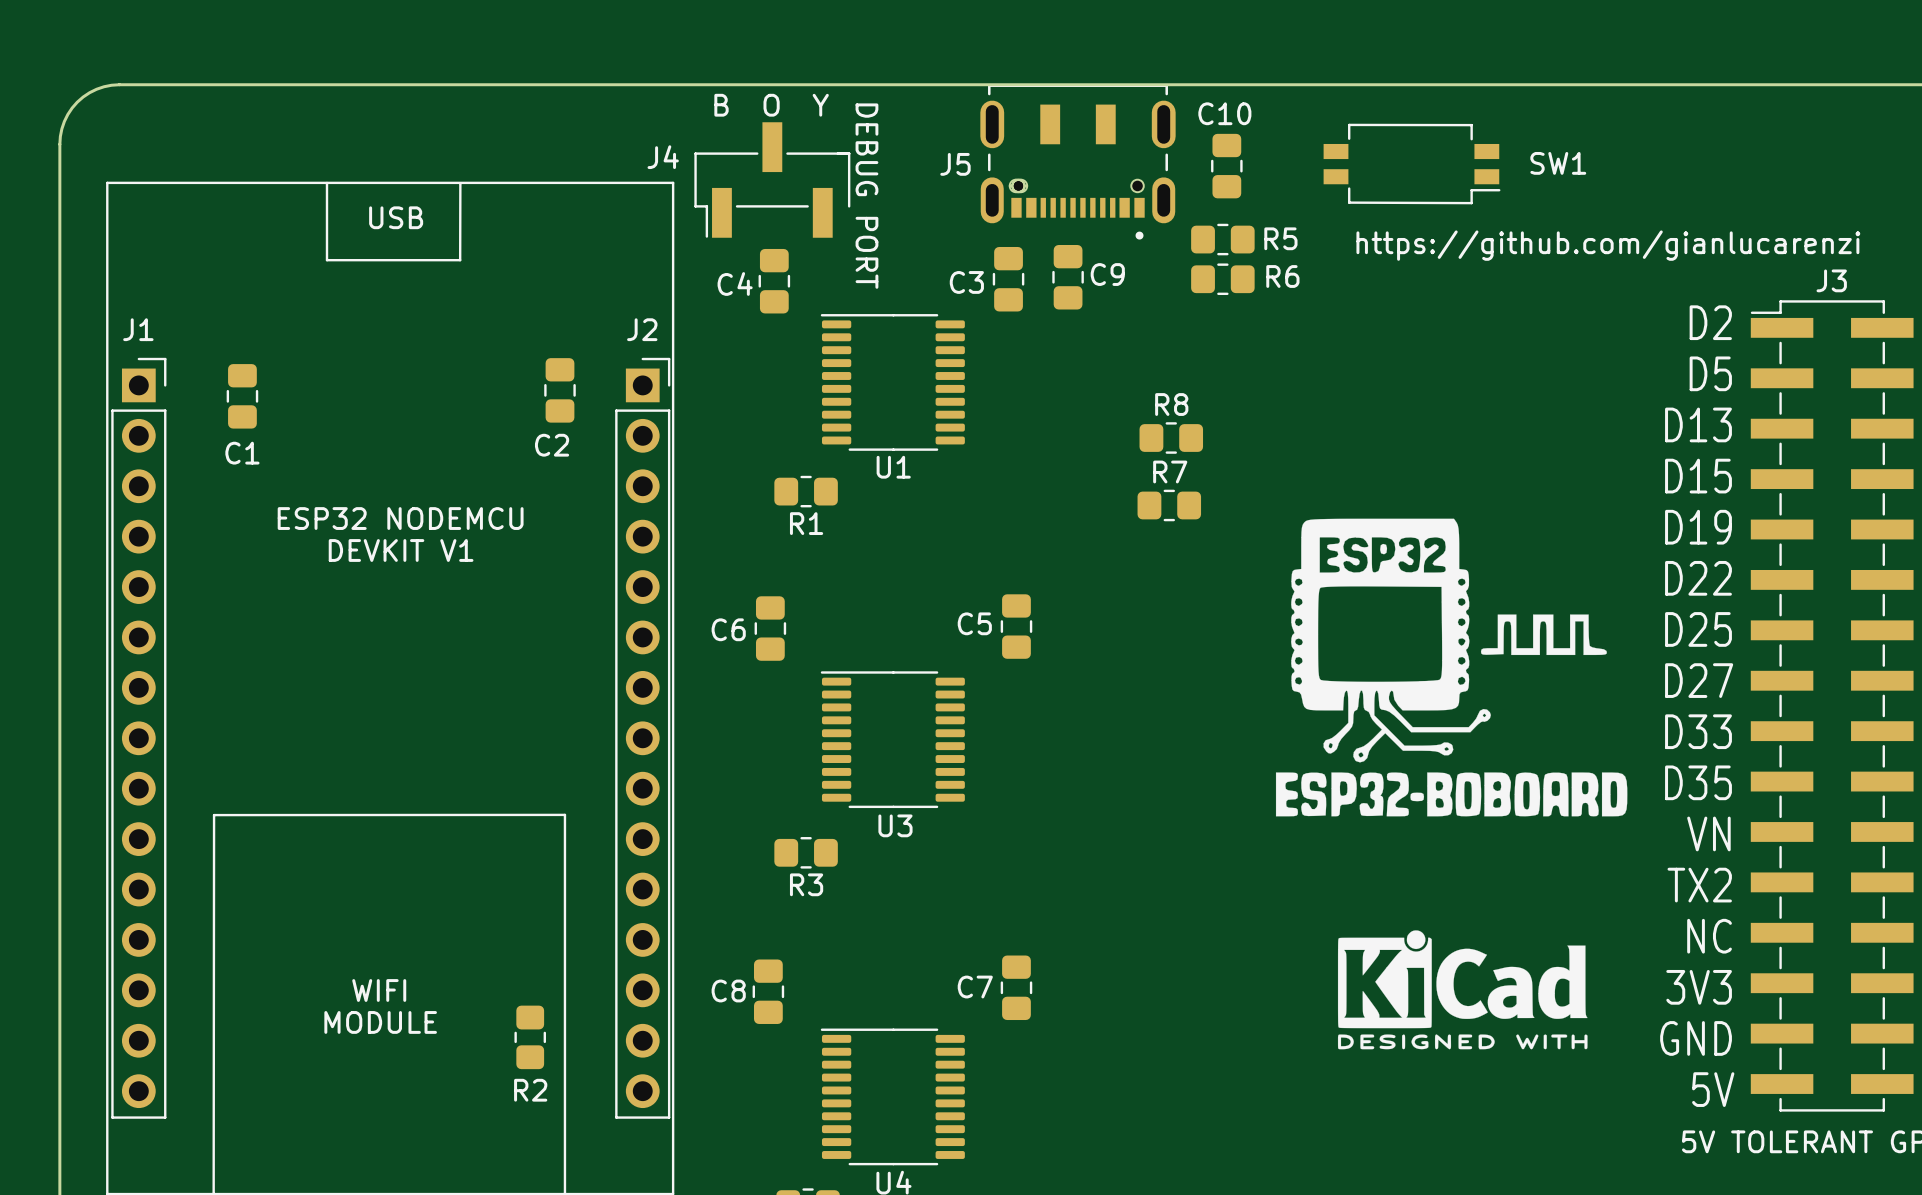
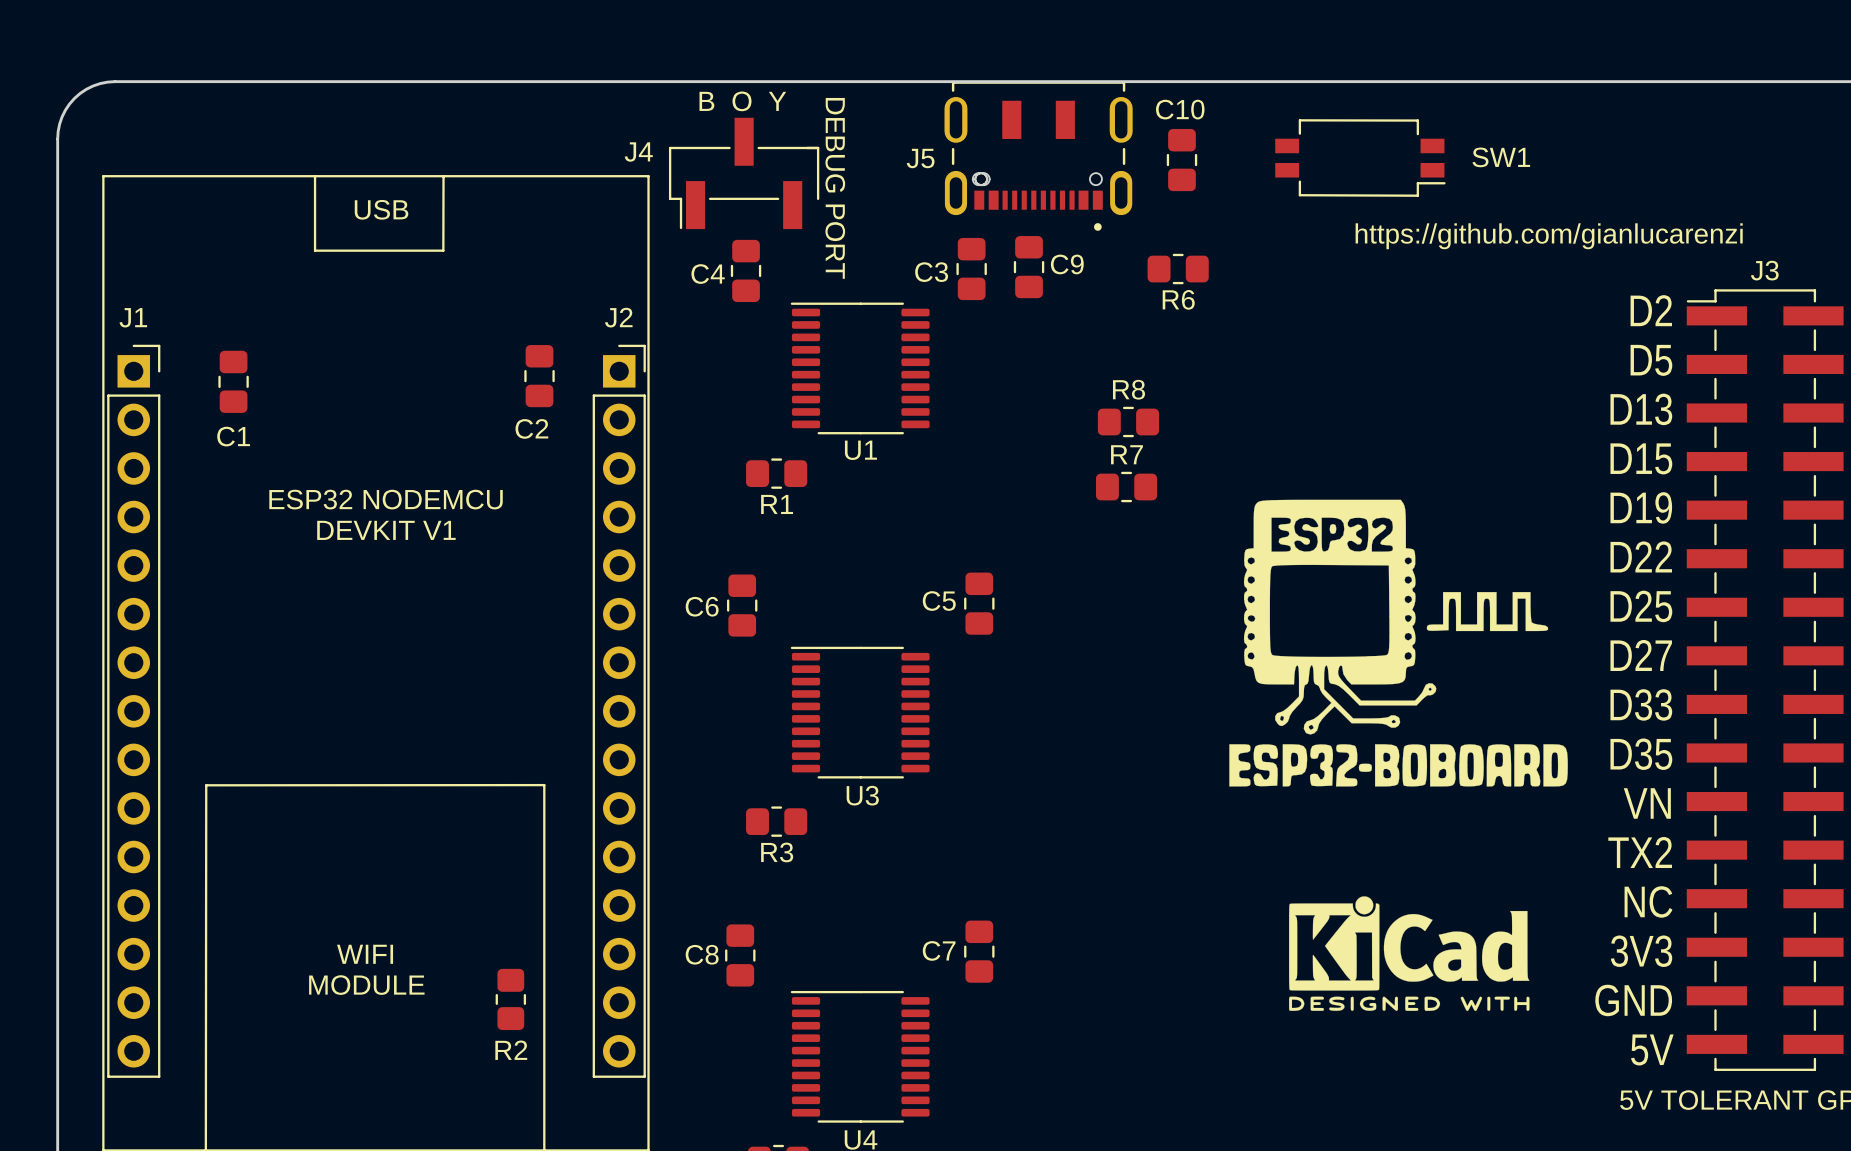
R5: (1222, 239) -> none
R6 name position: R6 (1282, 276) -> R6 (1178, 299)

